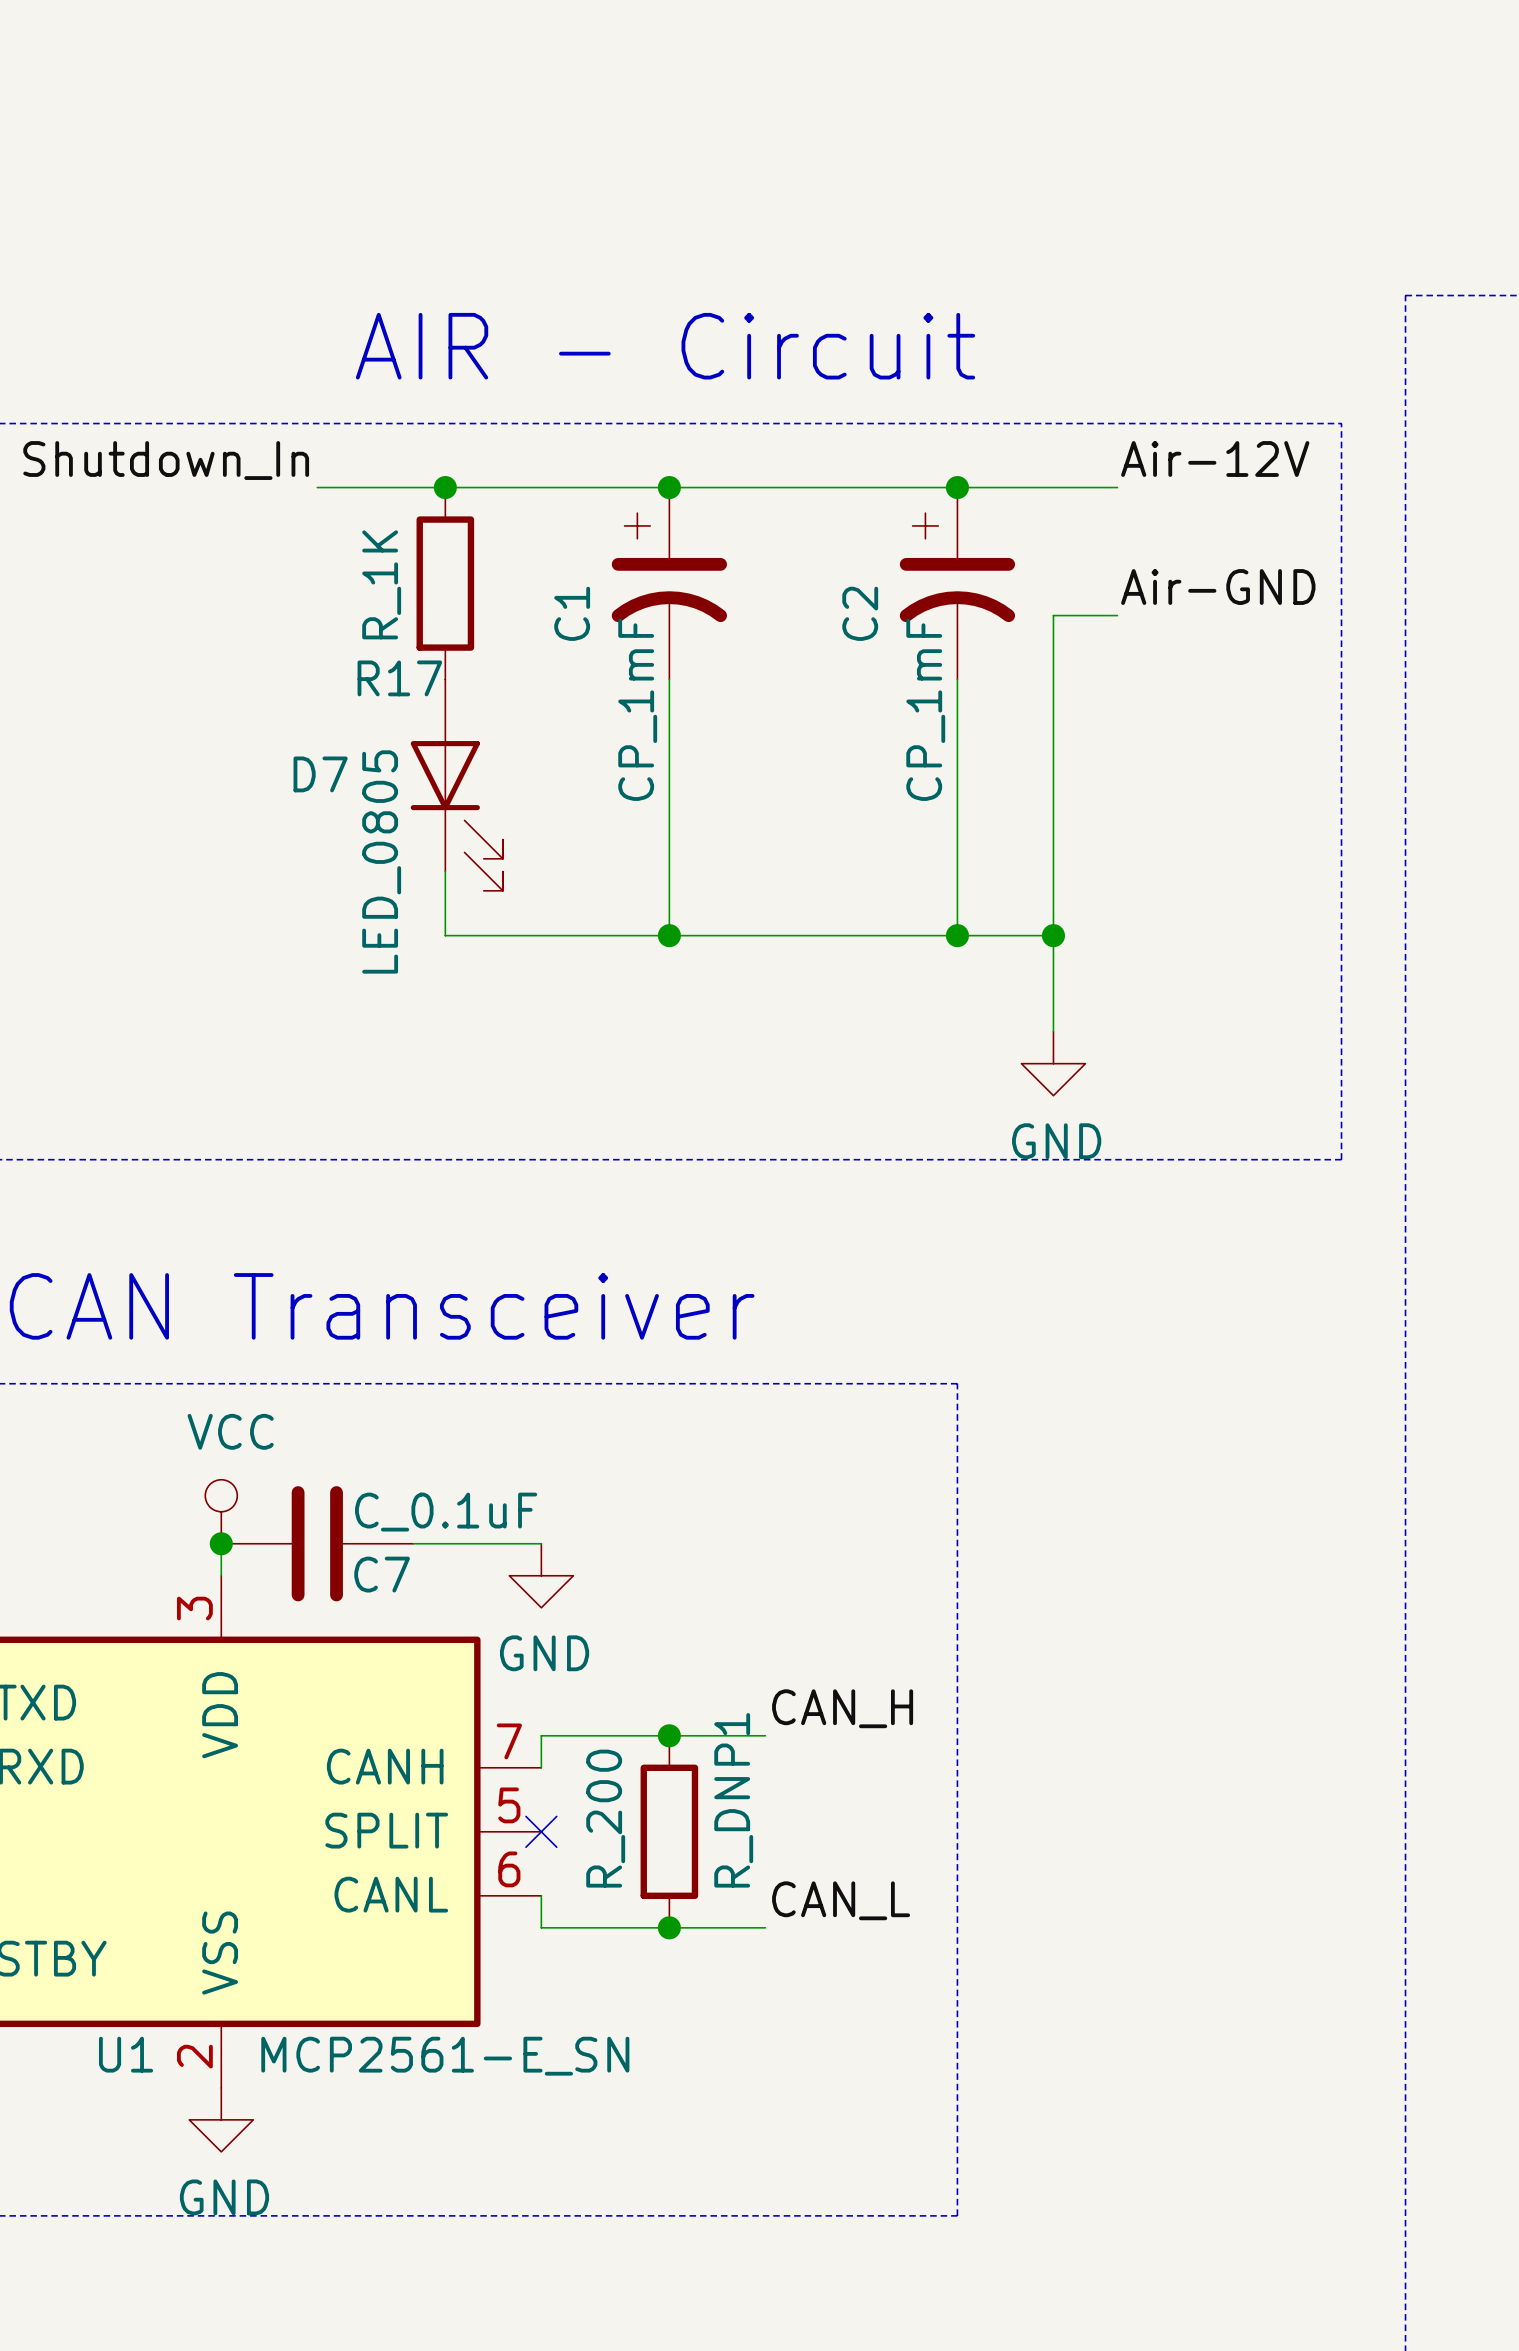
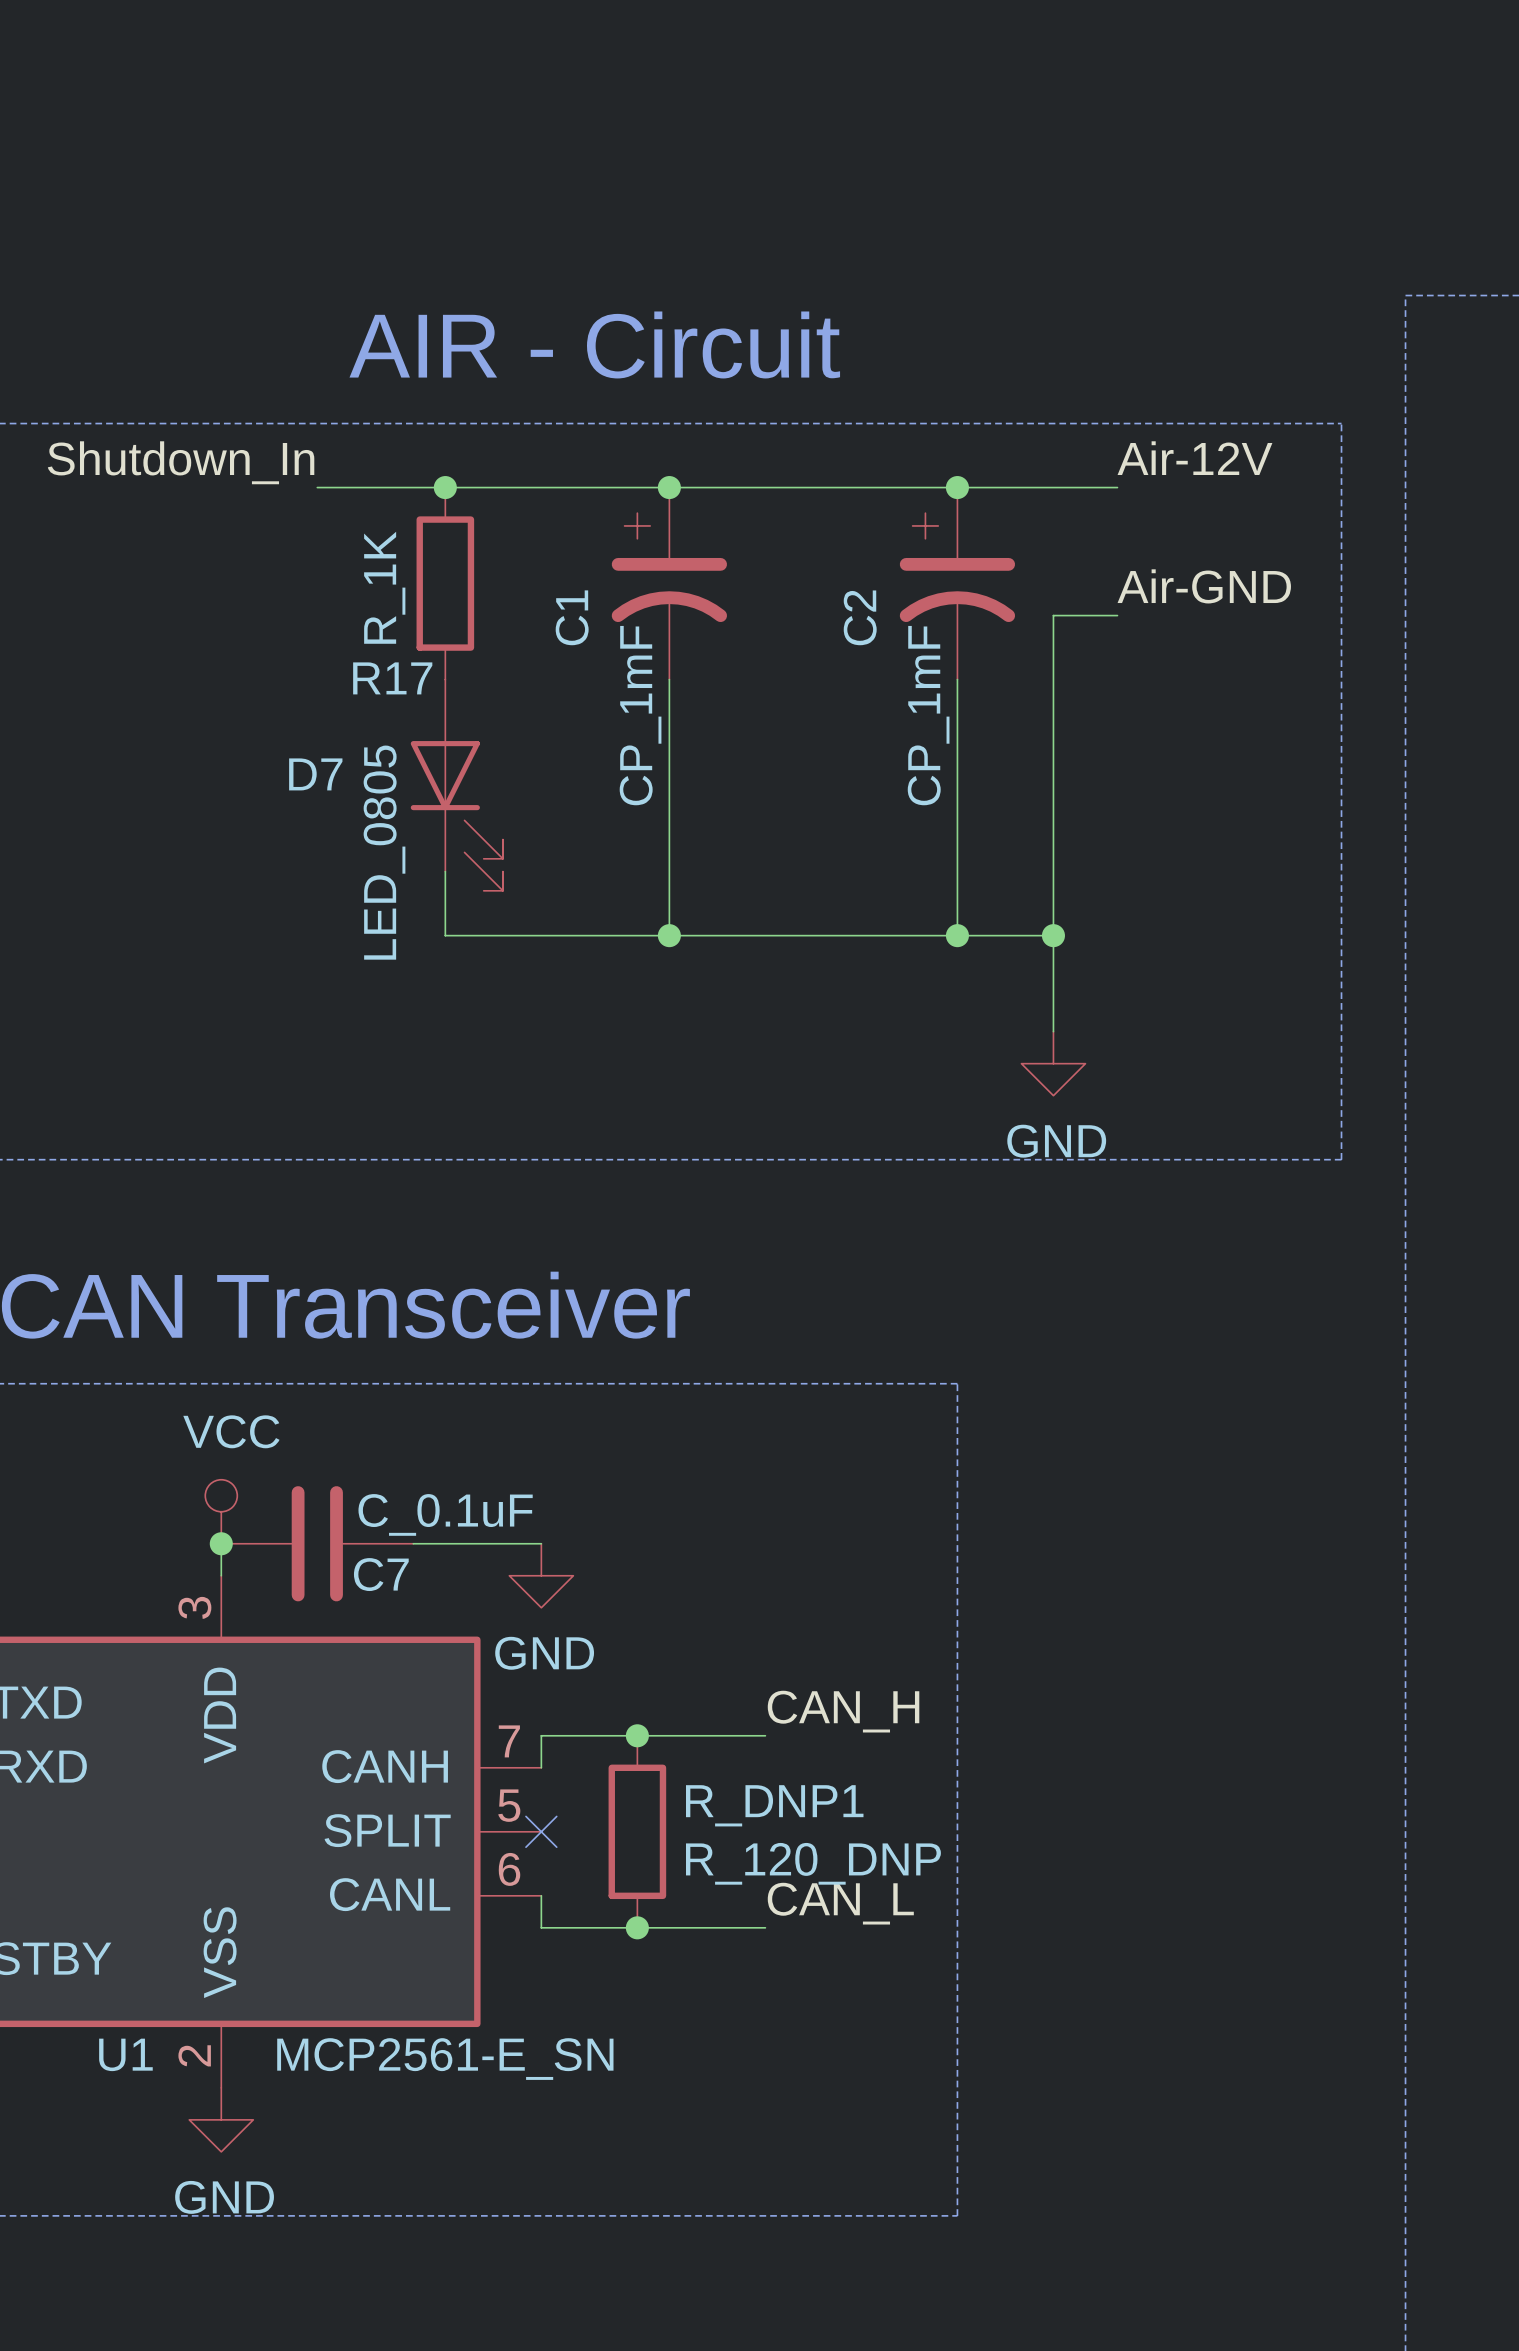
junction position: (669, 1735) -> (637, 1735)
R_DNP1 name rotation: 0° (733, 1800) -> 90° clockwise (774, 1805)
R_DNP1 value: R_200 (605, 1818) -> R_120_DNP (813, 1863)
R_DNP1 position: (669, 1831) -> (637, 1831)
junction position: (669, 1927) -> (637, 1927)

